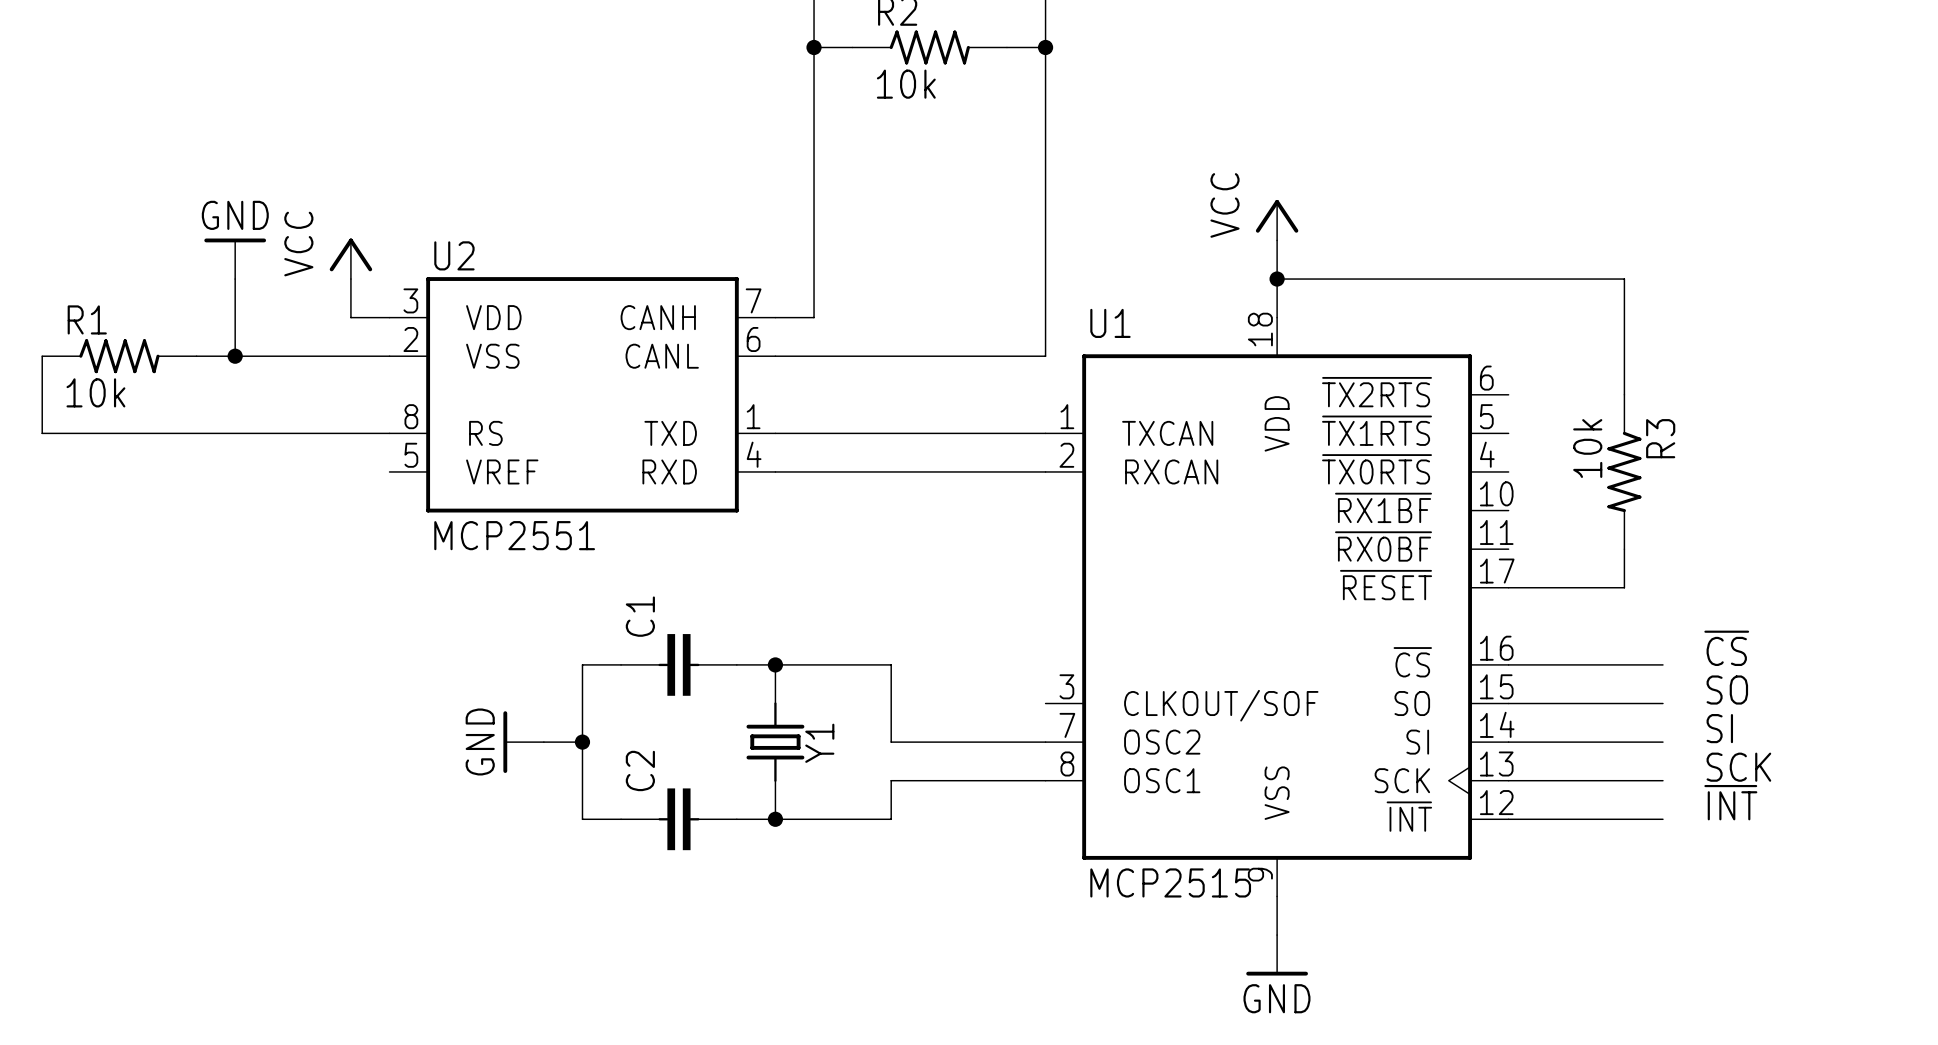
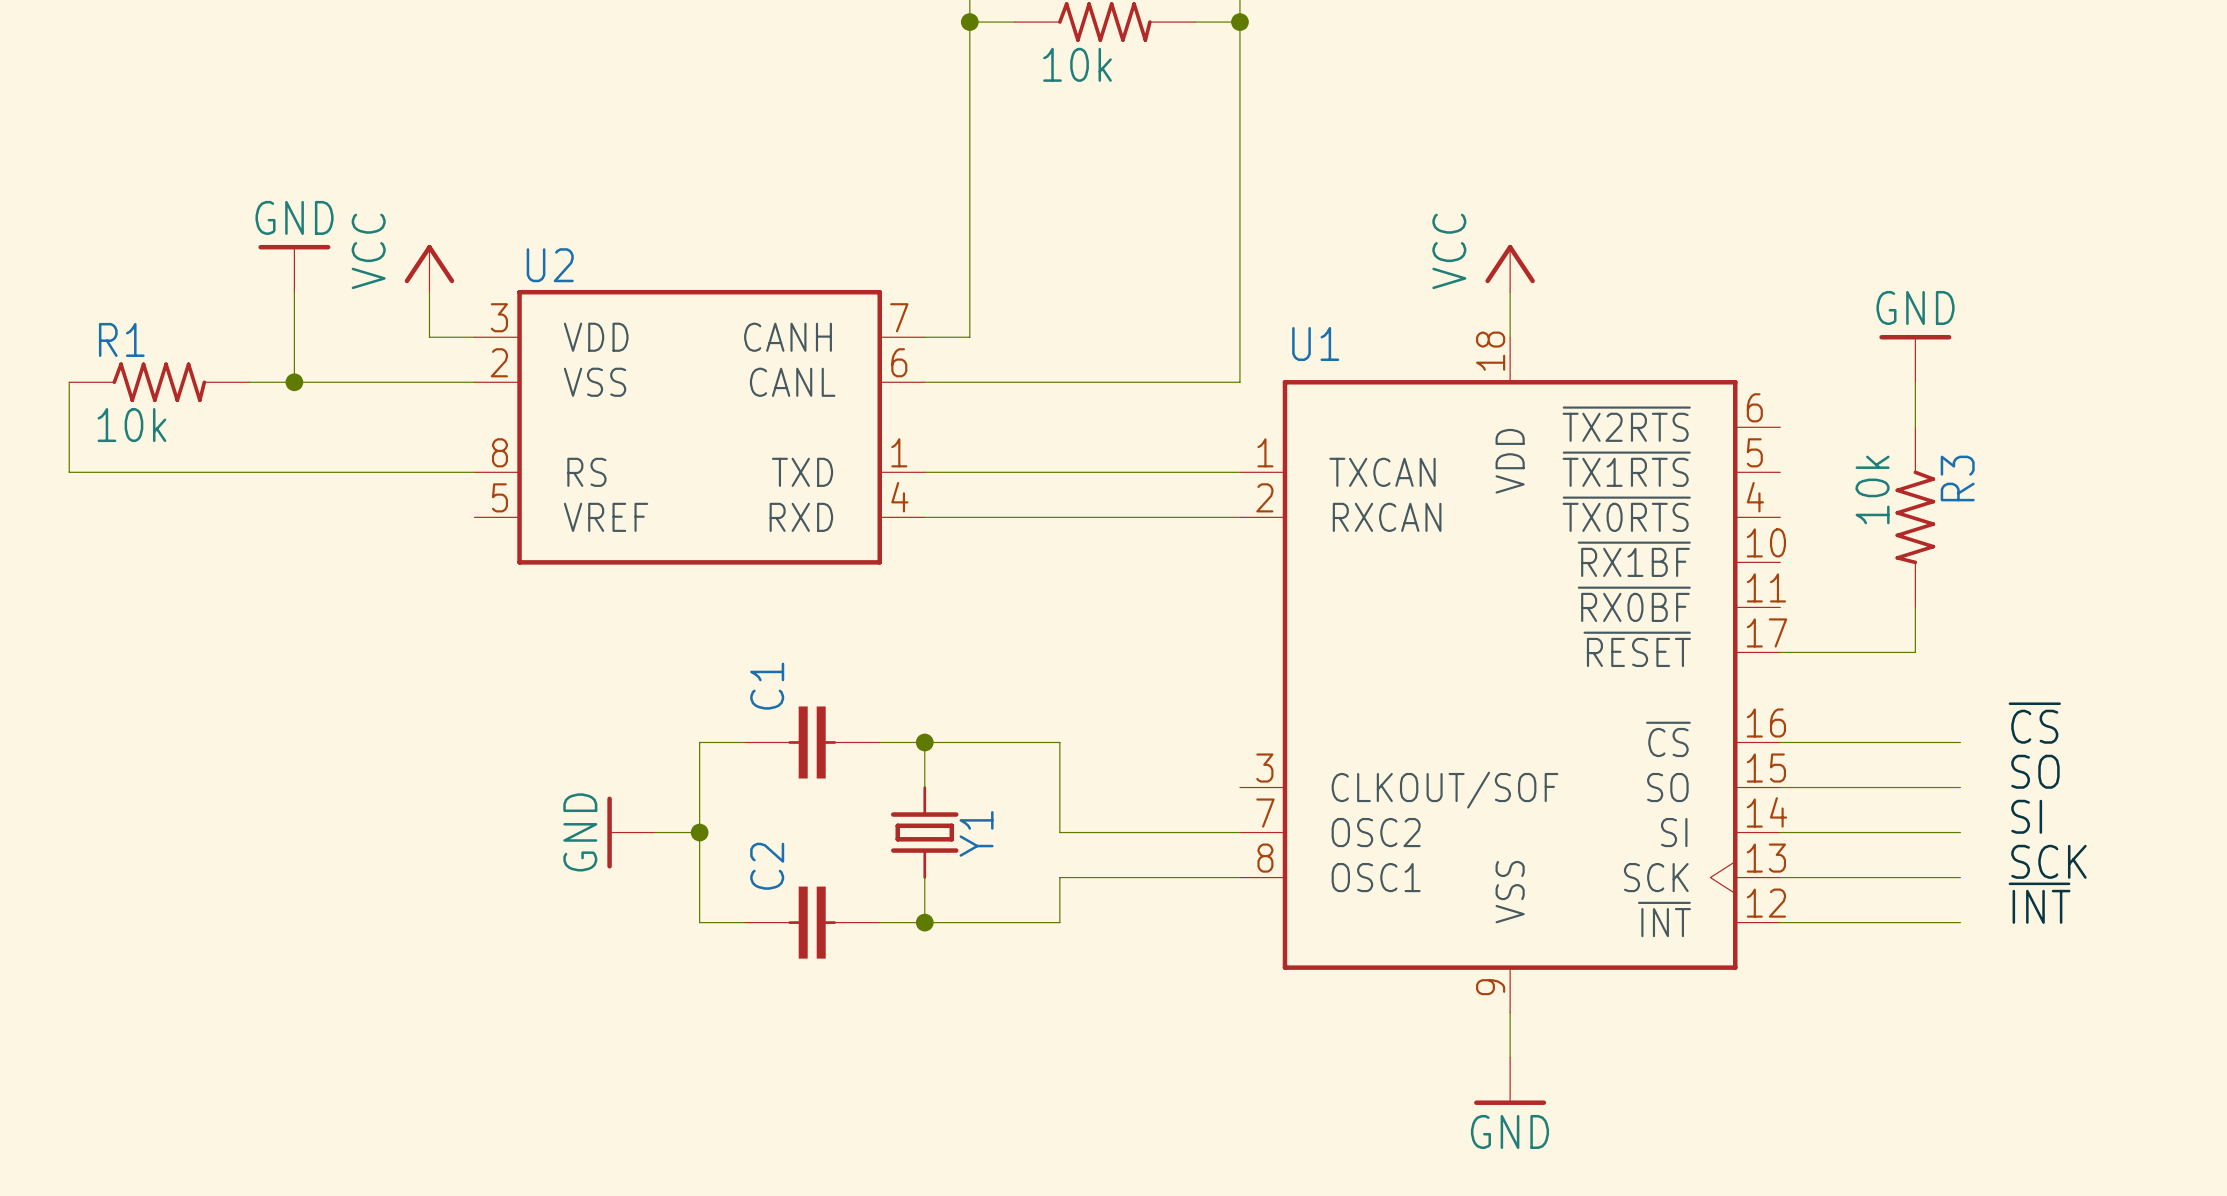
power symbol position: VCC (1277, 220) -> VCC (1510, 268)
wire: (1277, 240) (1277, 279) (1624, 279) (1624, 356) -> none
junction: (1277, 279) -> none
power symbol: none -> GND (1915, 358)
U2 value: MCP2551 (514, 535) -> none
U1 value: MCP2515 (1170, 882) -> none

